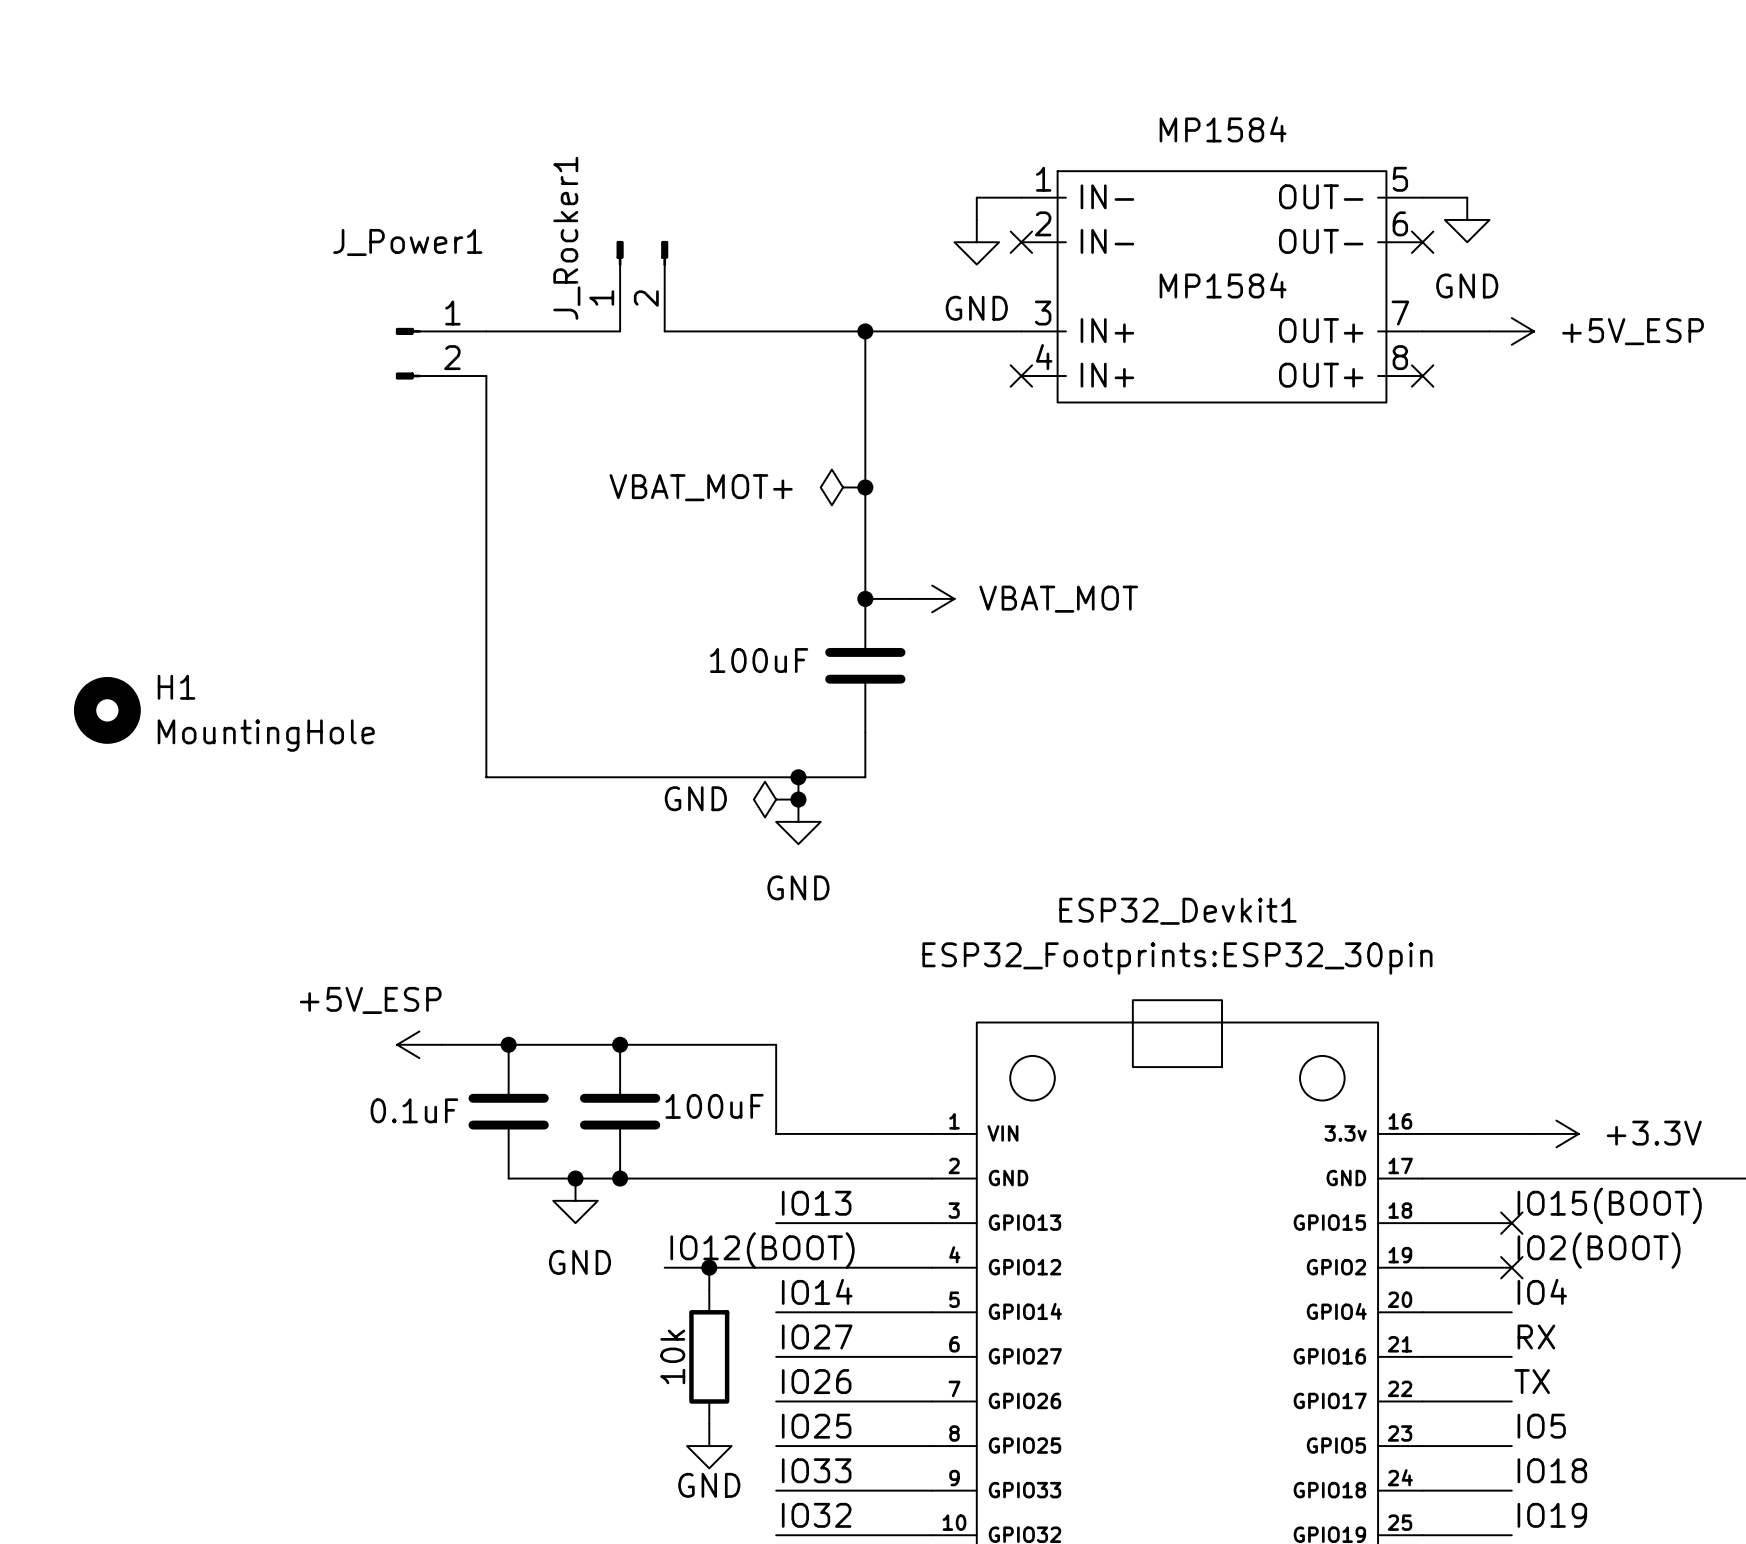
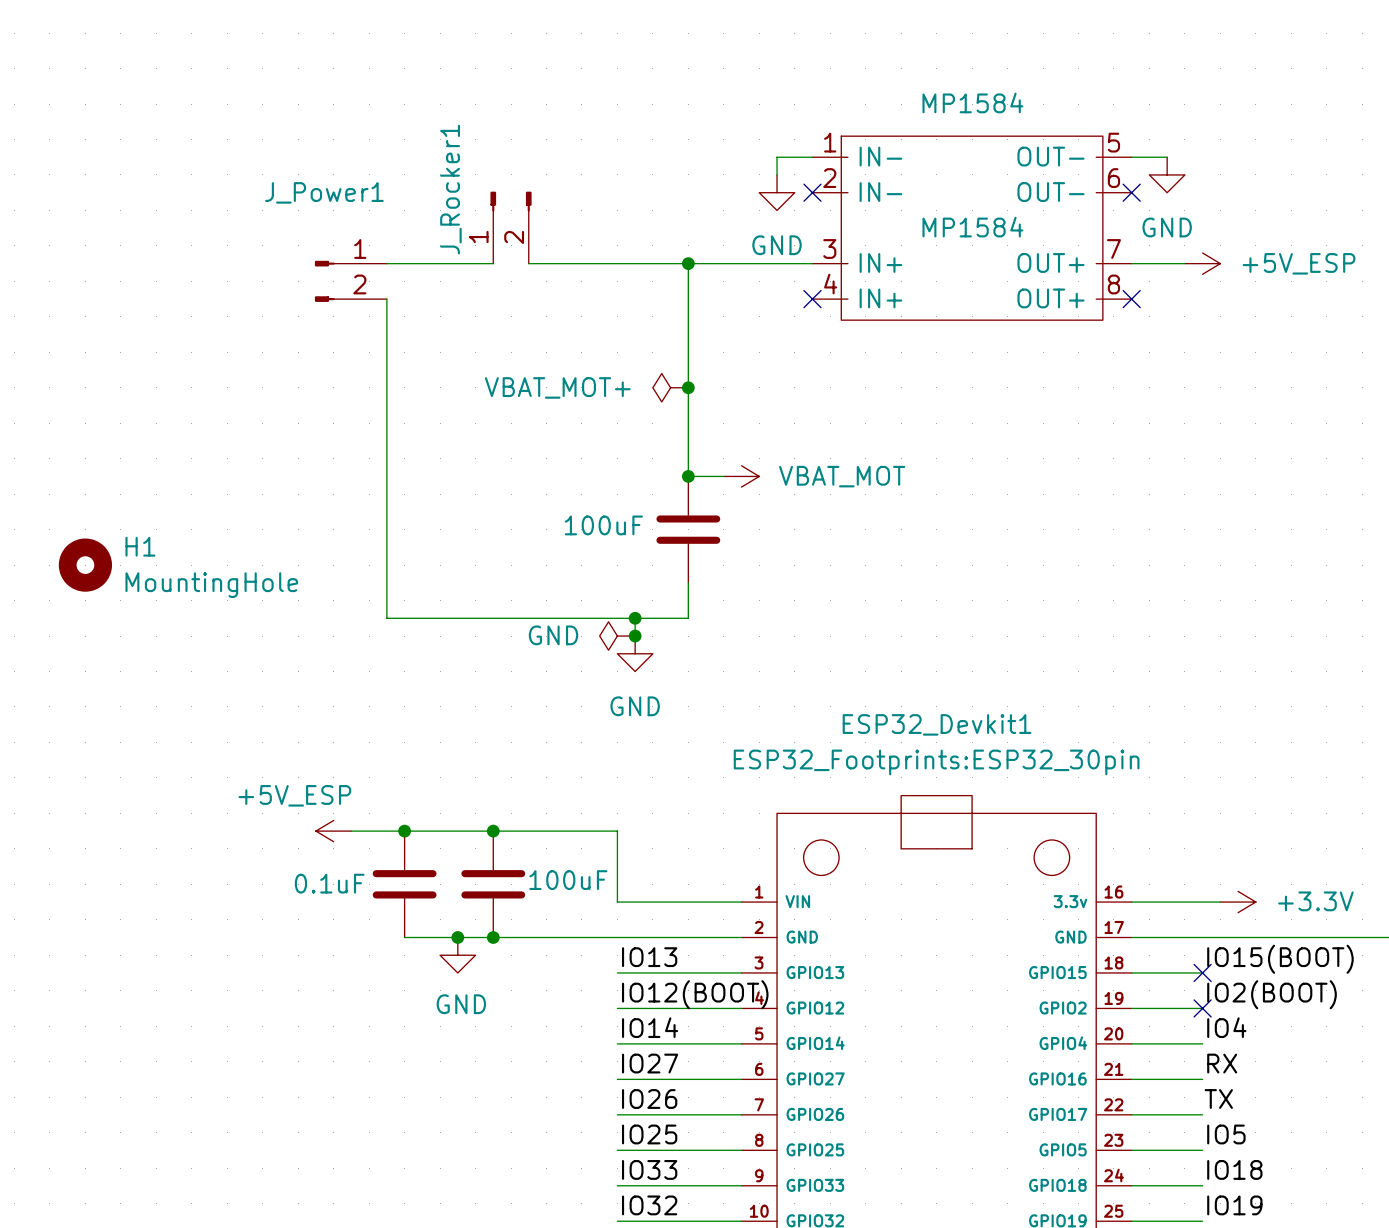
label position: IO12(BOOT) (762, 1250) -> IO12(BOOT) (695, 994)
wire: (664, 1267) (776, 1267) -> none
wire: (709, 1267) (709, 1290) -> none
junction: (709, 1267) -> none
part: 10k (709, 1356) -> none
power symbol: GND (709, 1446) -> none

